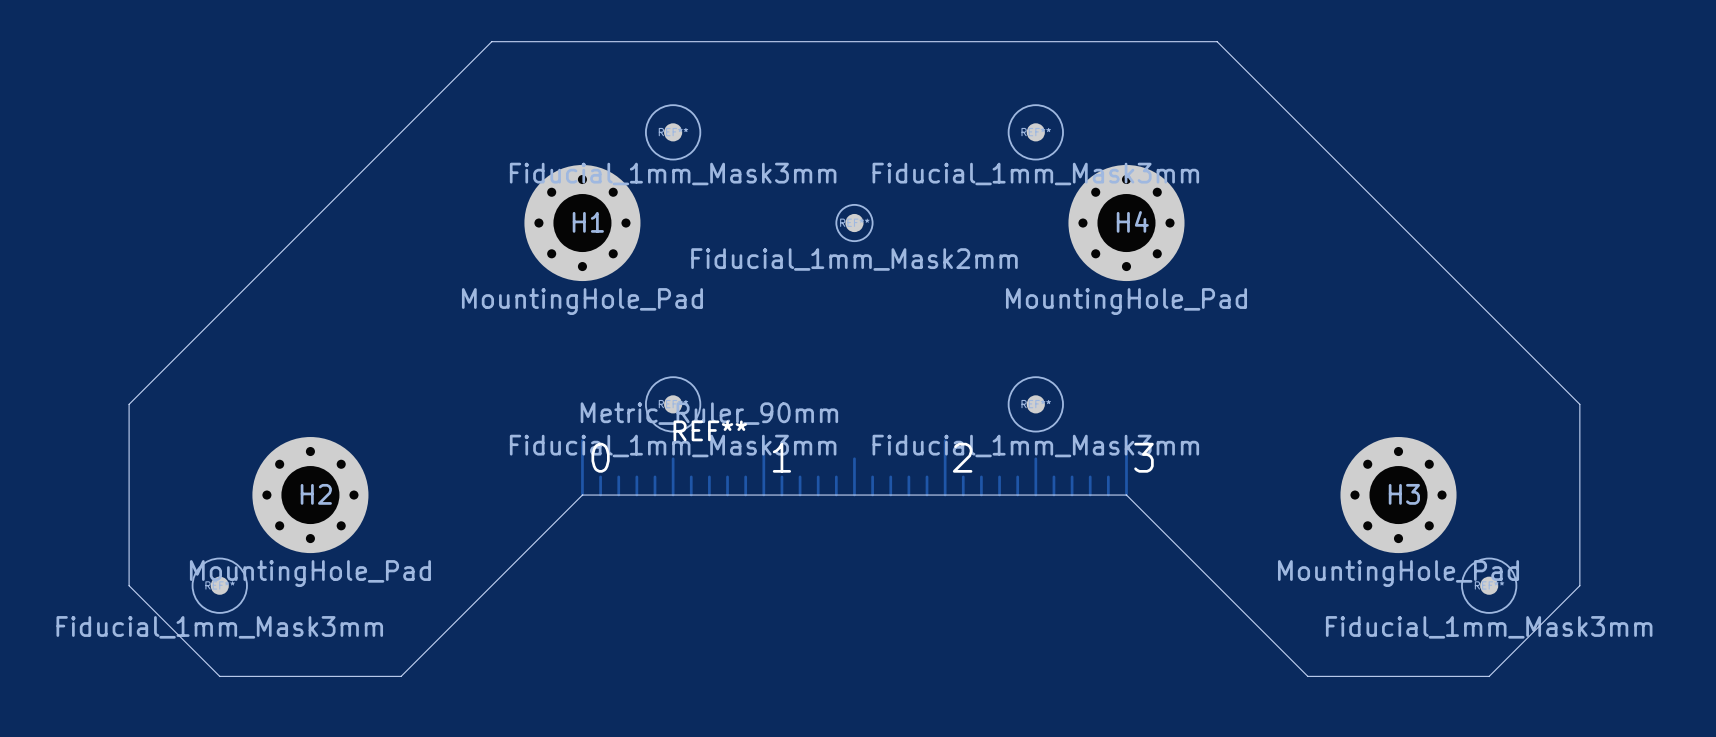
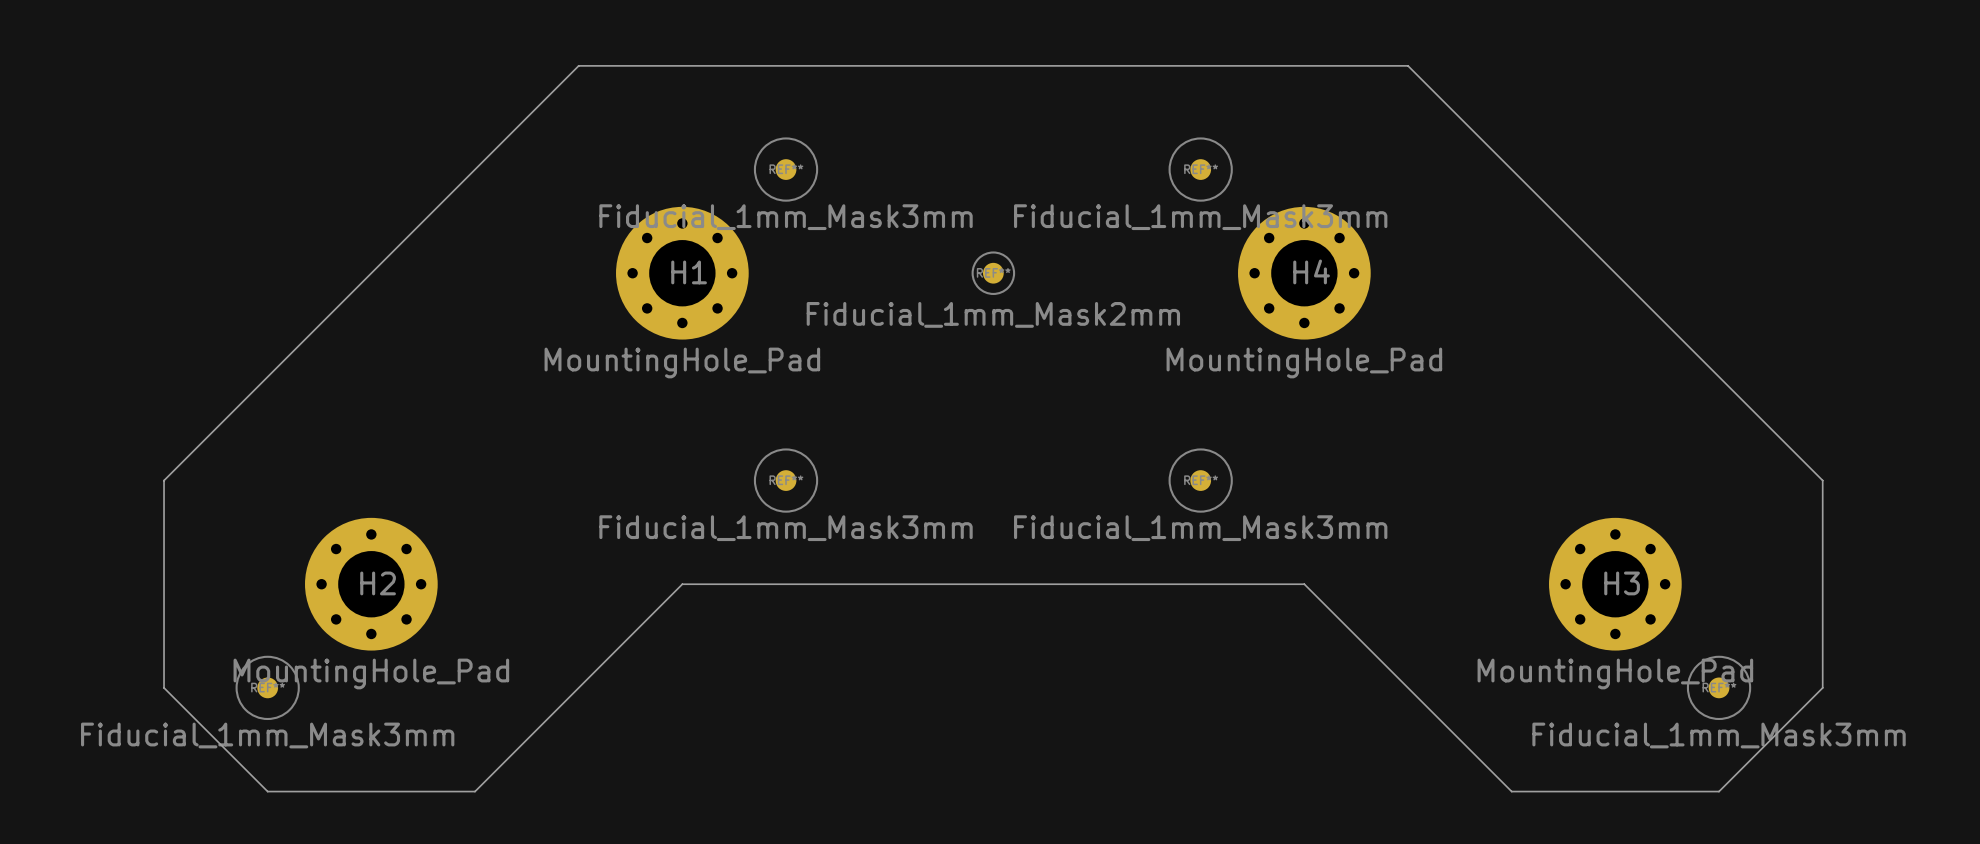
REF**: Metric_Ruler_90mm (854, 467) -> none

